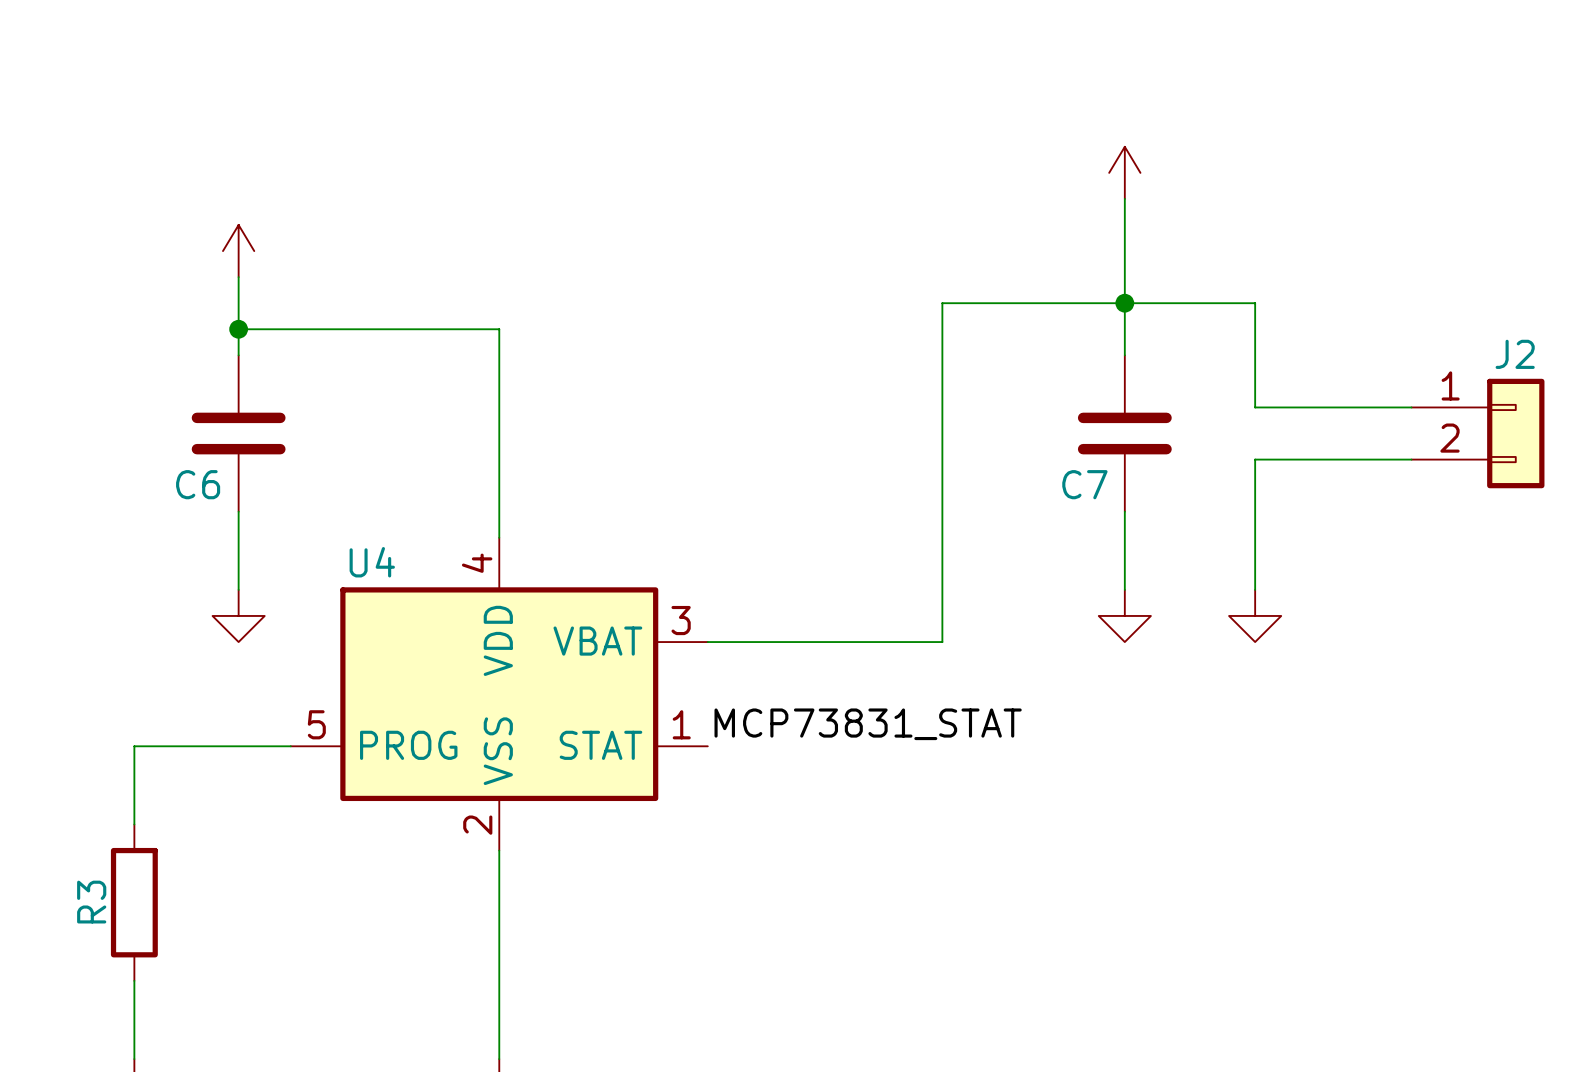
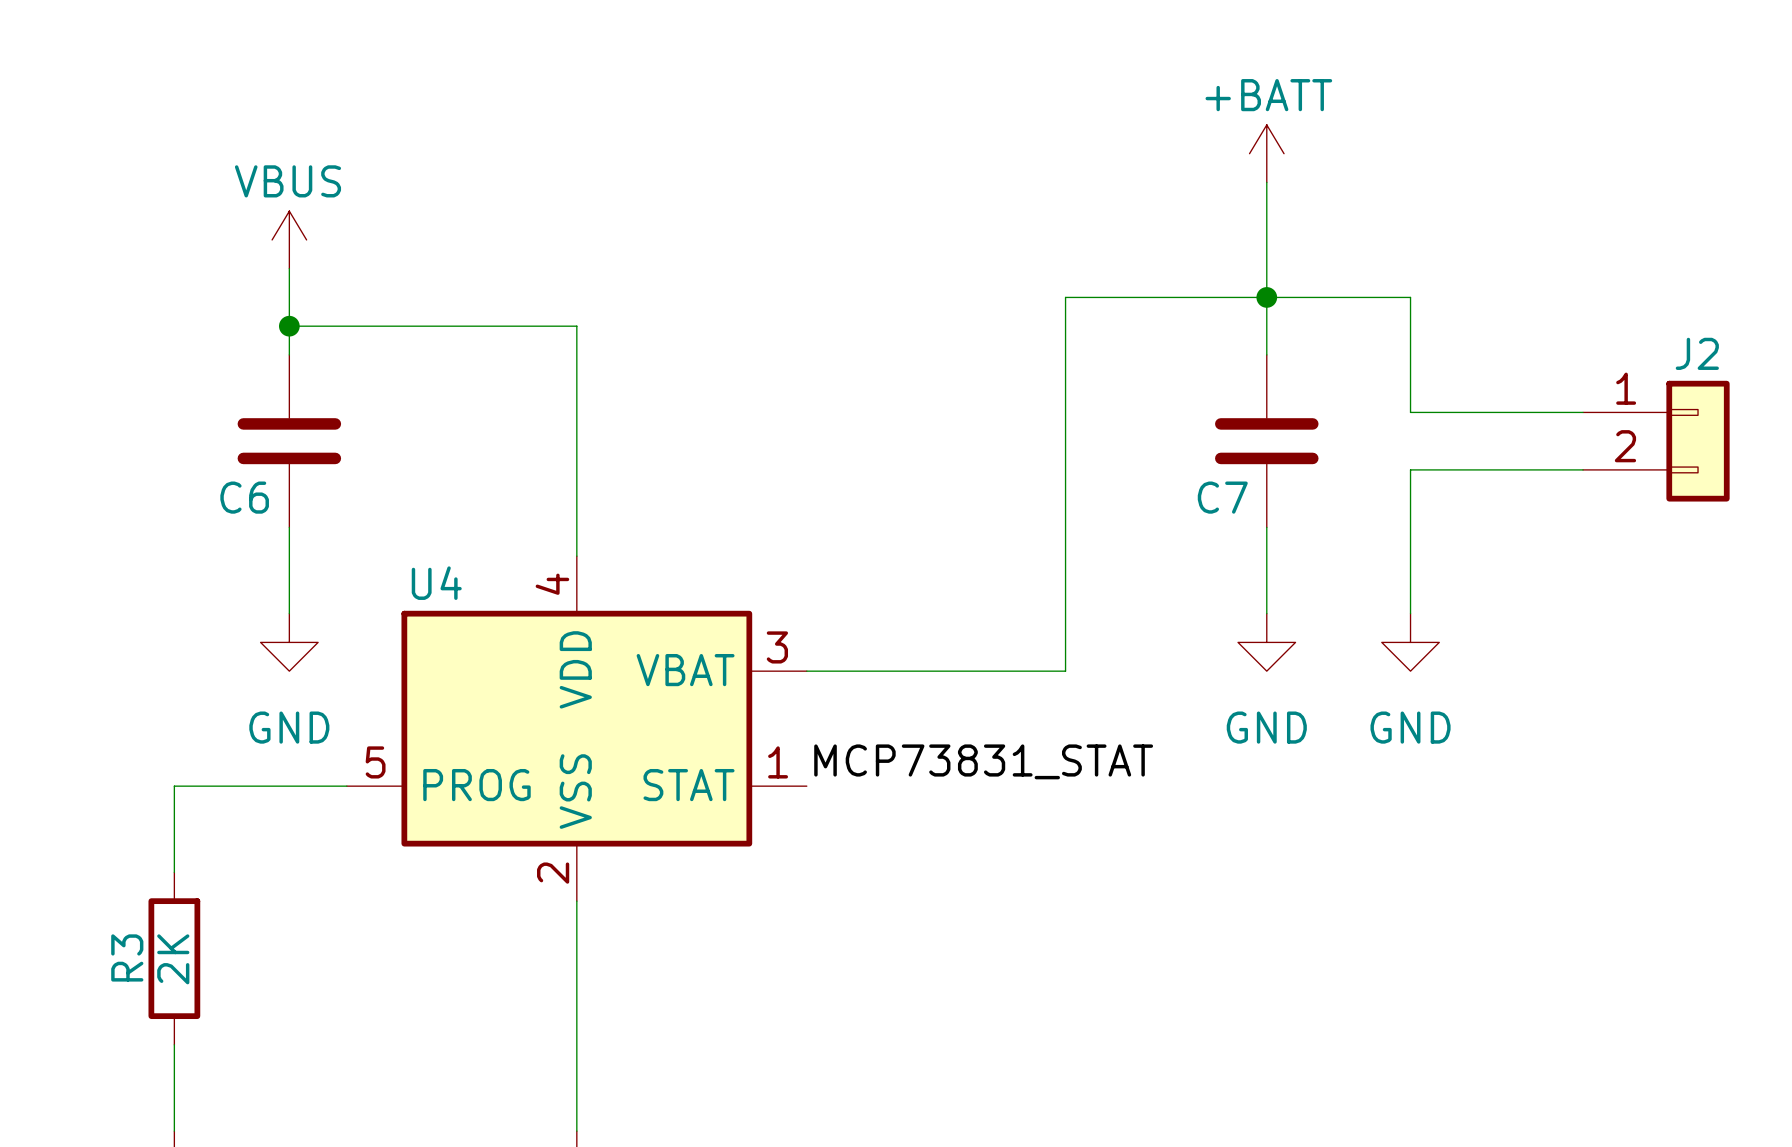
power symbol text: none -> +BATT (1268, 95)
power symbol text: none -> VBUS (287, 181)
power symbol text: none -> GND (289, 727)
power symbol text: none -> GND (1266, 727)
power symbol text: none -> GND (1410, 727)
R3 value: none -> 2K (173, 959)

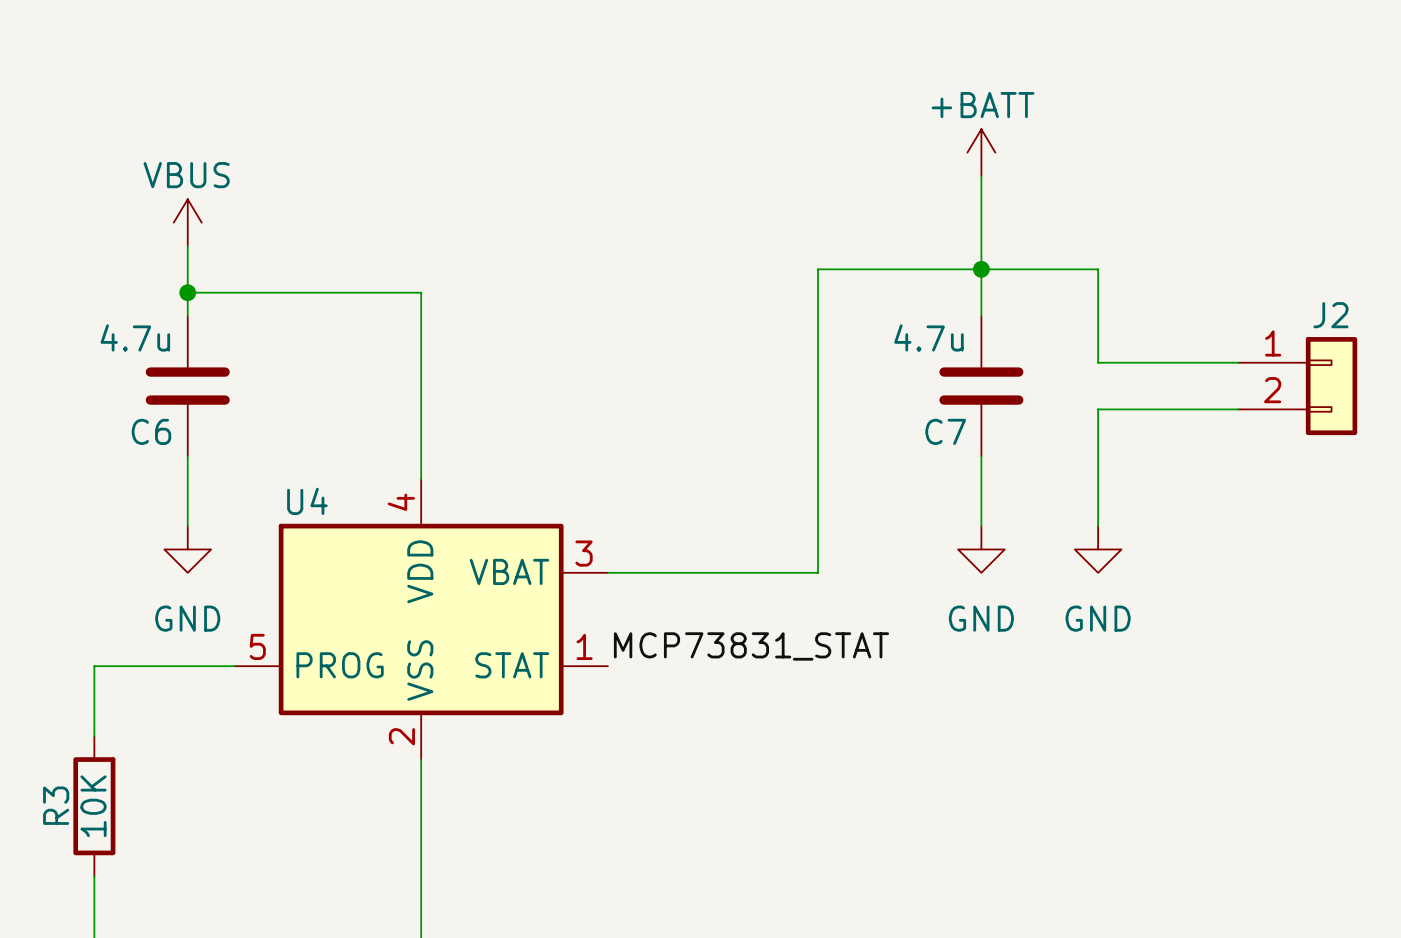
C6 value: none -> 4.7u (135, 337)
C7 value: none -> 4.7u (928, 337)
R3 value: 2K (173, 959) -> 10K (93, 806)

